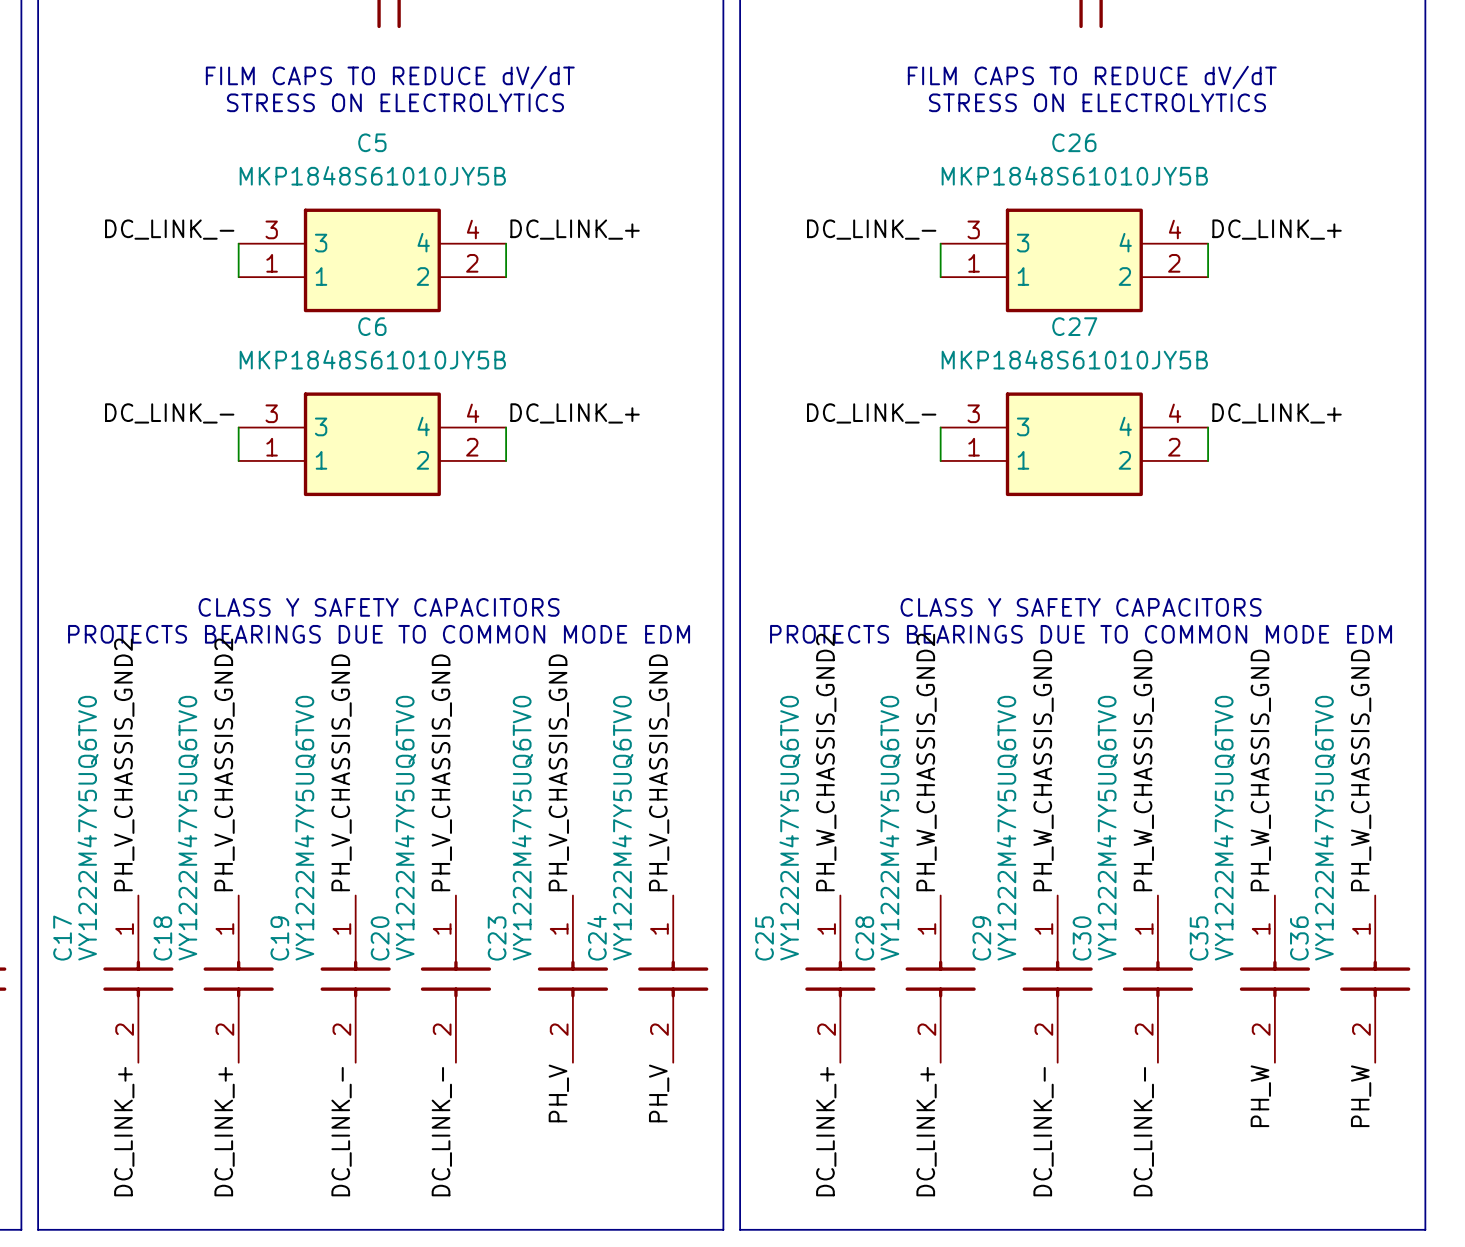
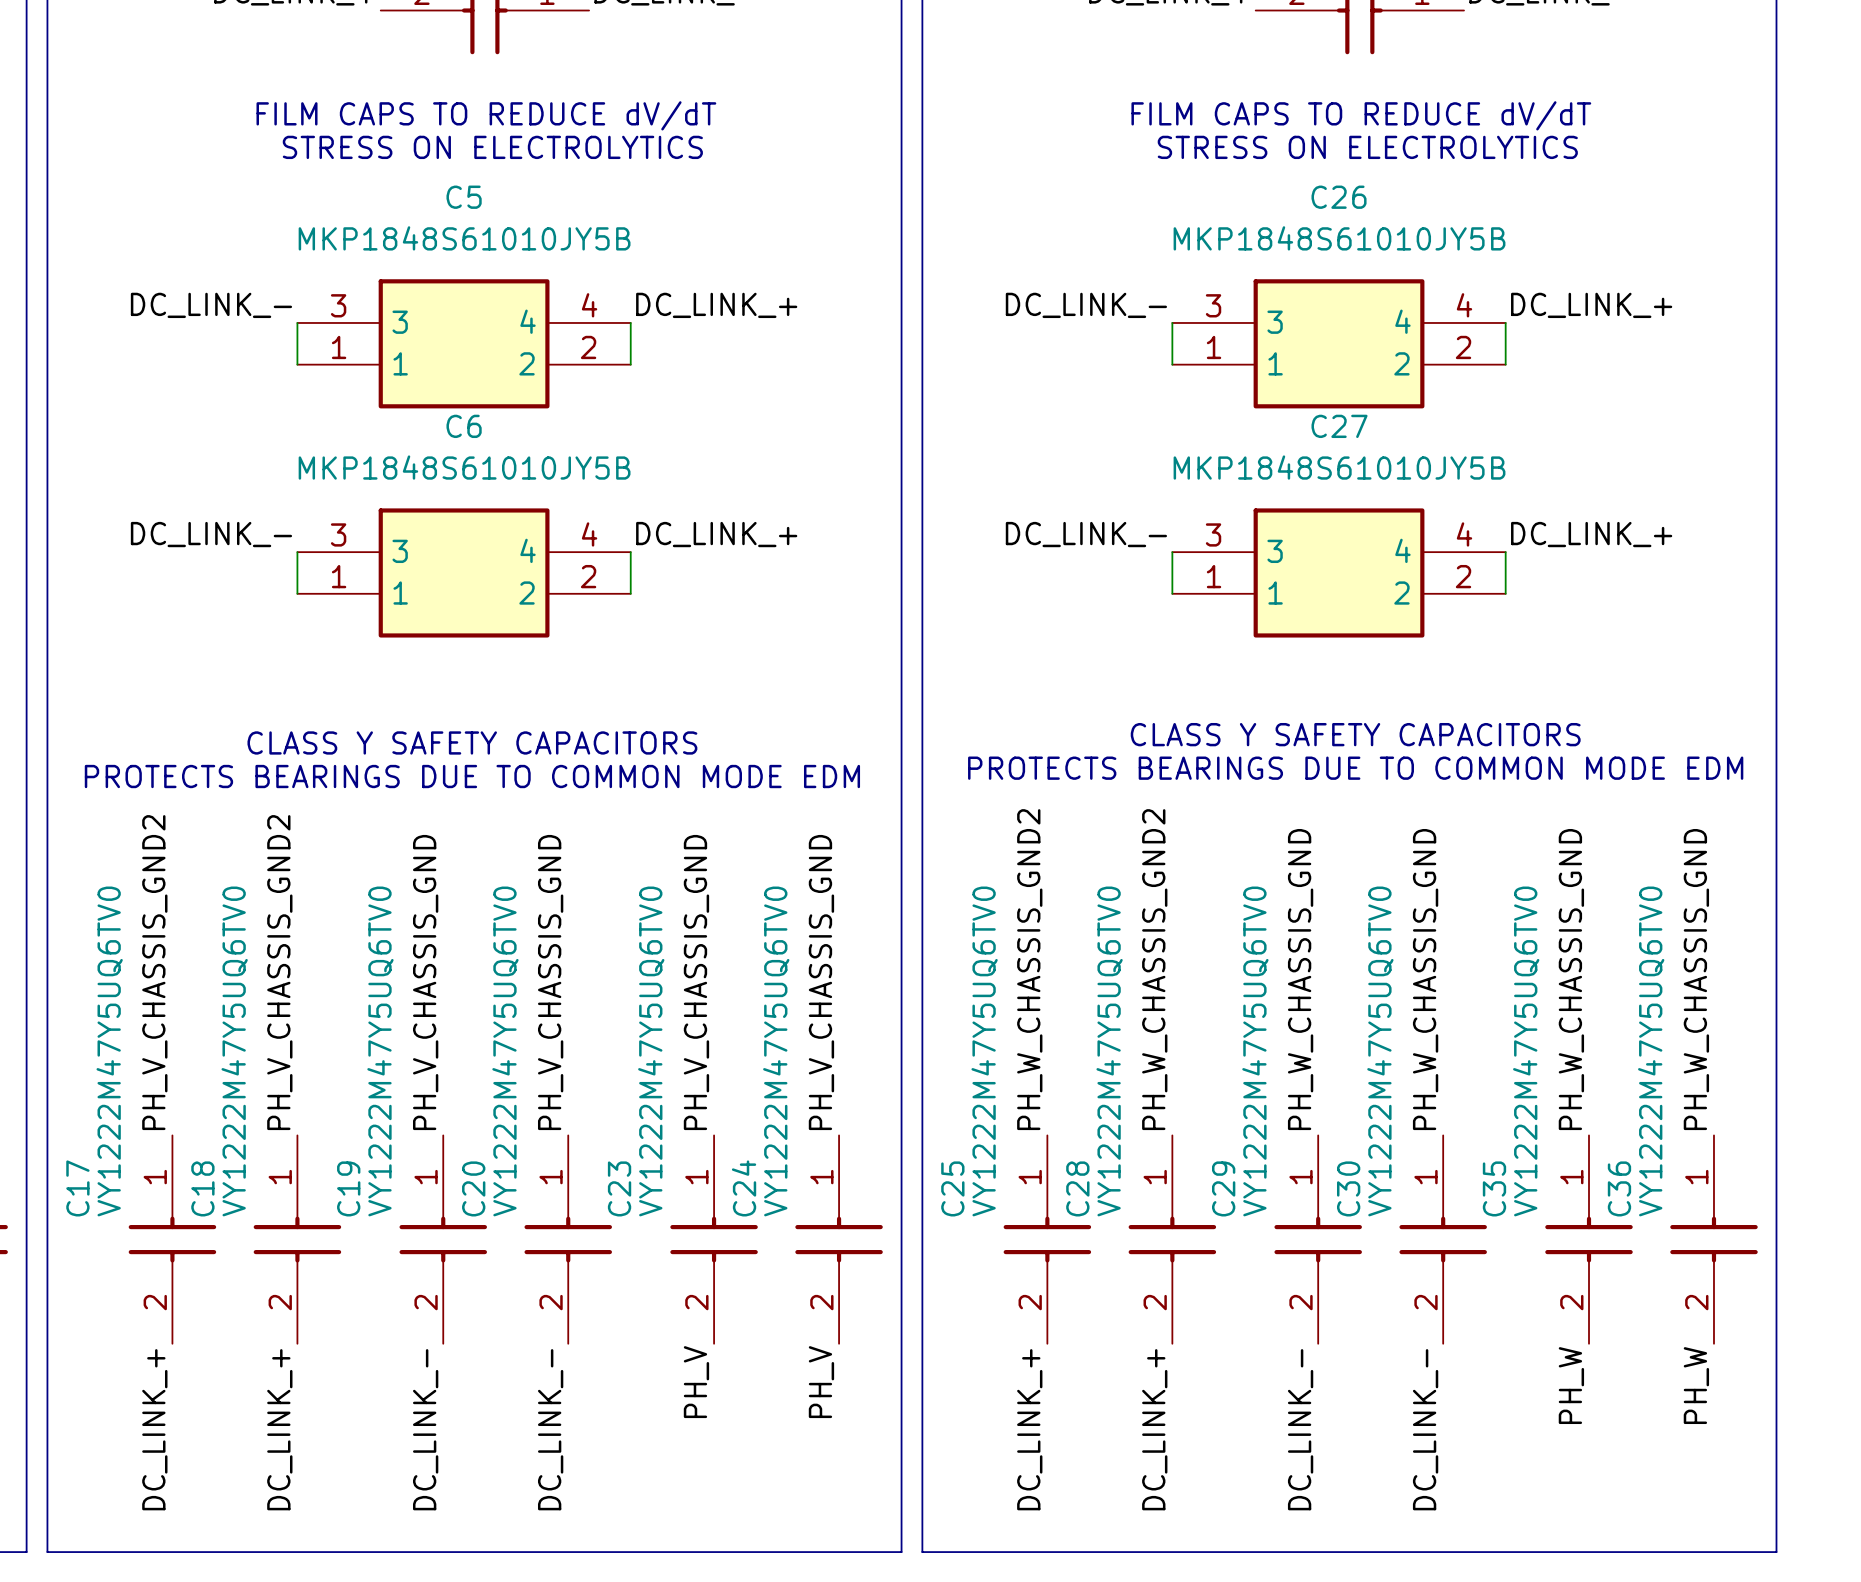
text: none -> CLASS Y SAFETY CAPACITORS (472, 742)
text: CLASS Y SAFETY CAPACITORS (379, 607) -> PROTECTS BEARINGS DUE TO COMMON MODE EDM (472, 776)
text position: CLASS Y SAFETY CAPACITORS (1081, 607) -> CLASS Y SAFETY CAPACITORS (1355, 734)
text: PROTECTS BEARINGS DUE TO COMMON MODE EDM (379, 634) -> none
text position: PROTECTS BEARINGS DUE TO COMMON MODE EDM (1081, 634) -> PROTECTS BEARINGS DUE TO COMMON MODE EDM (1355, 768)

